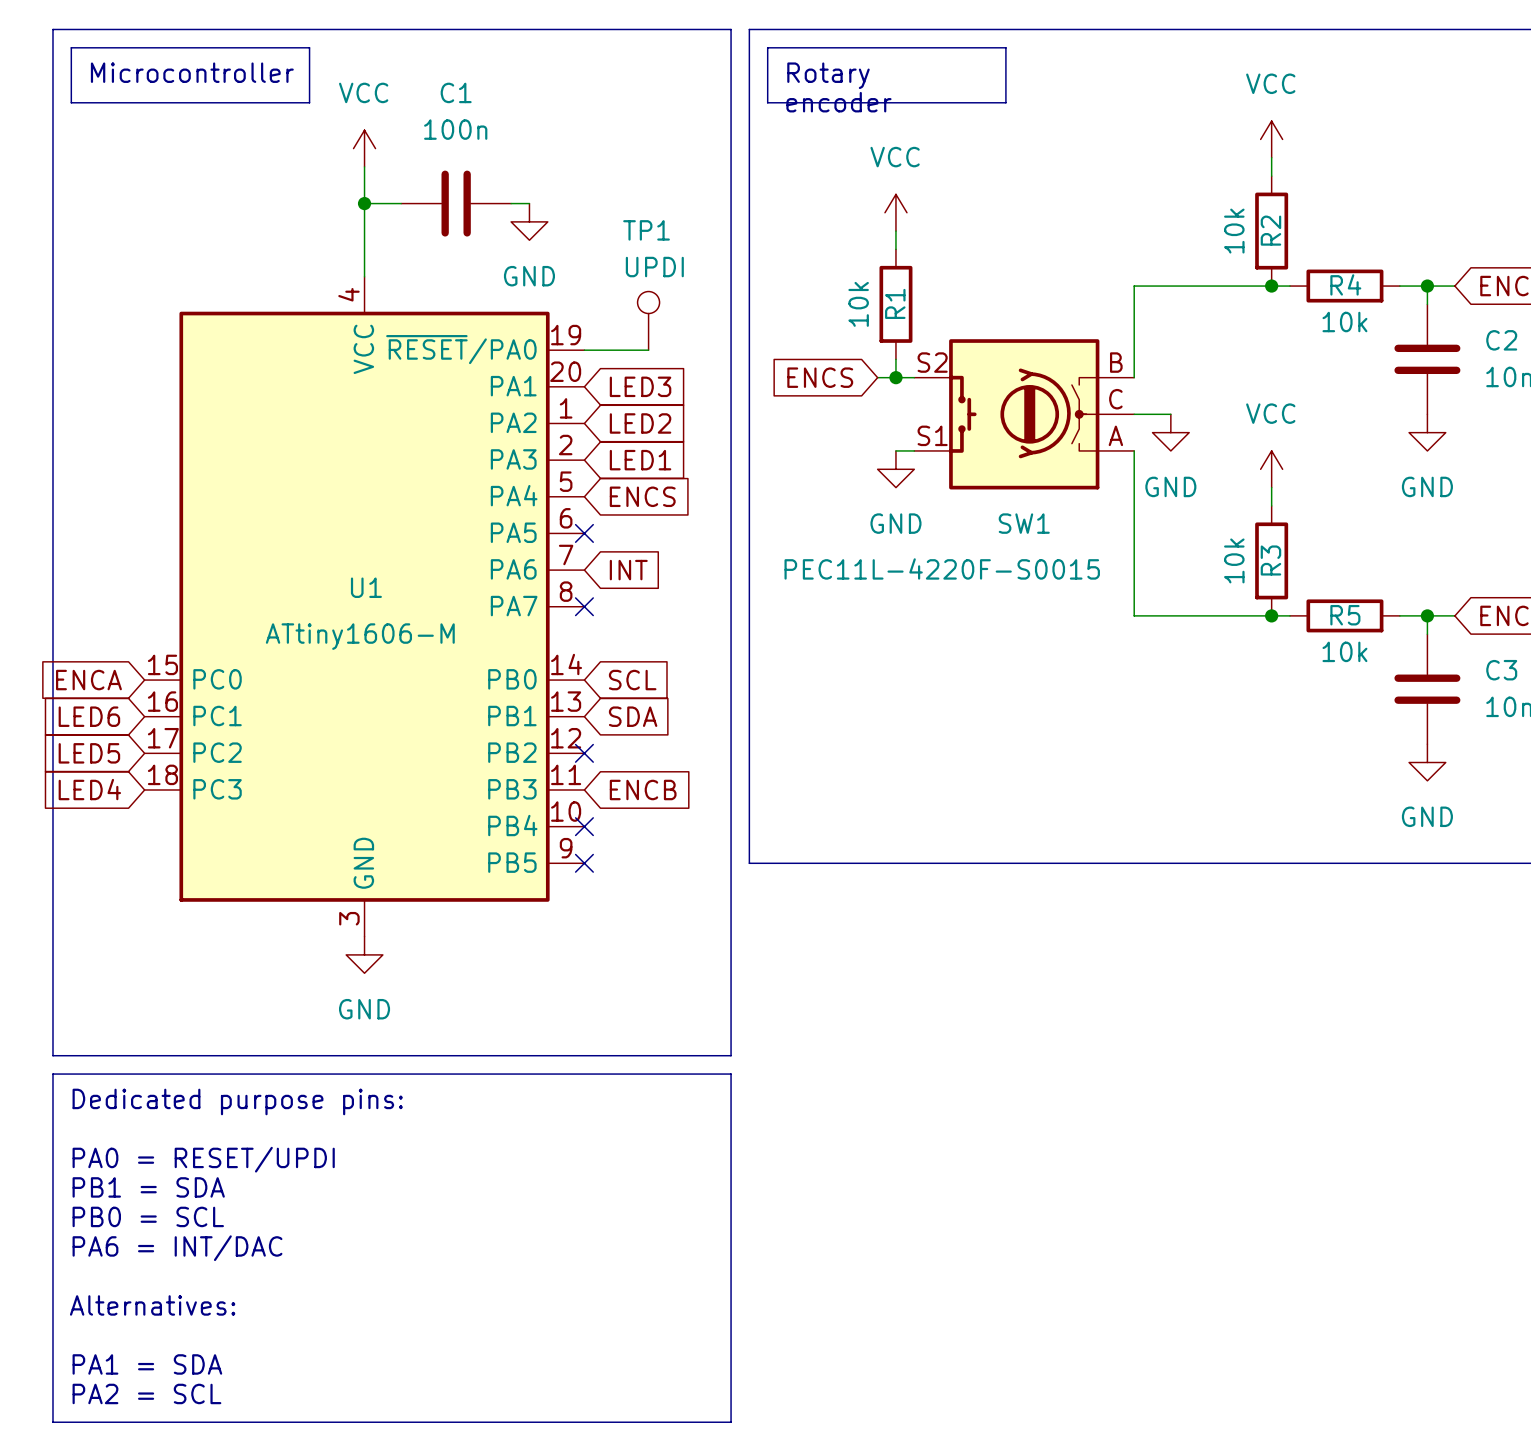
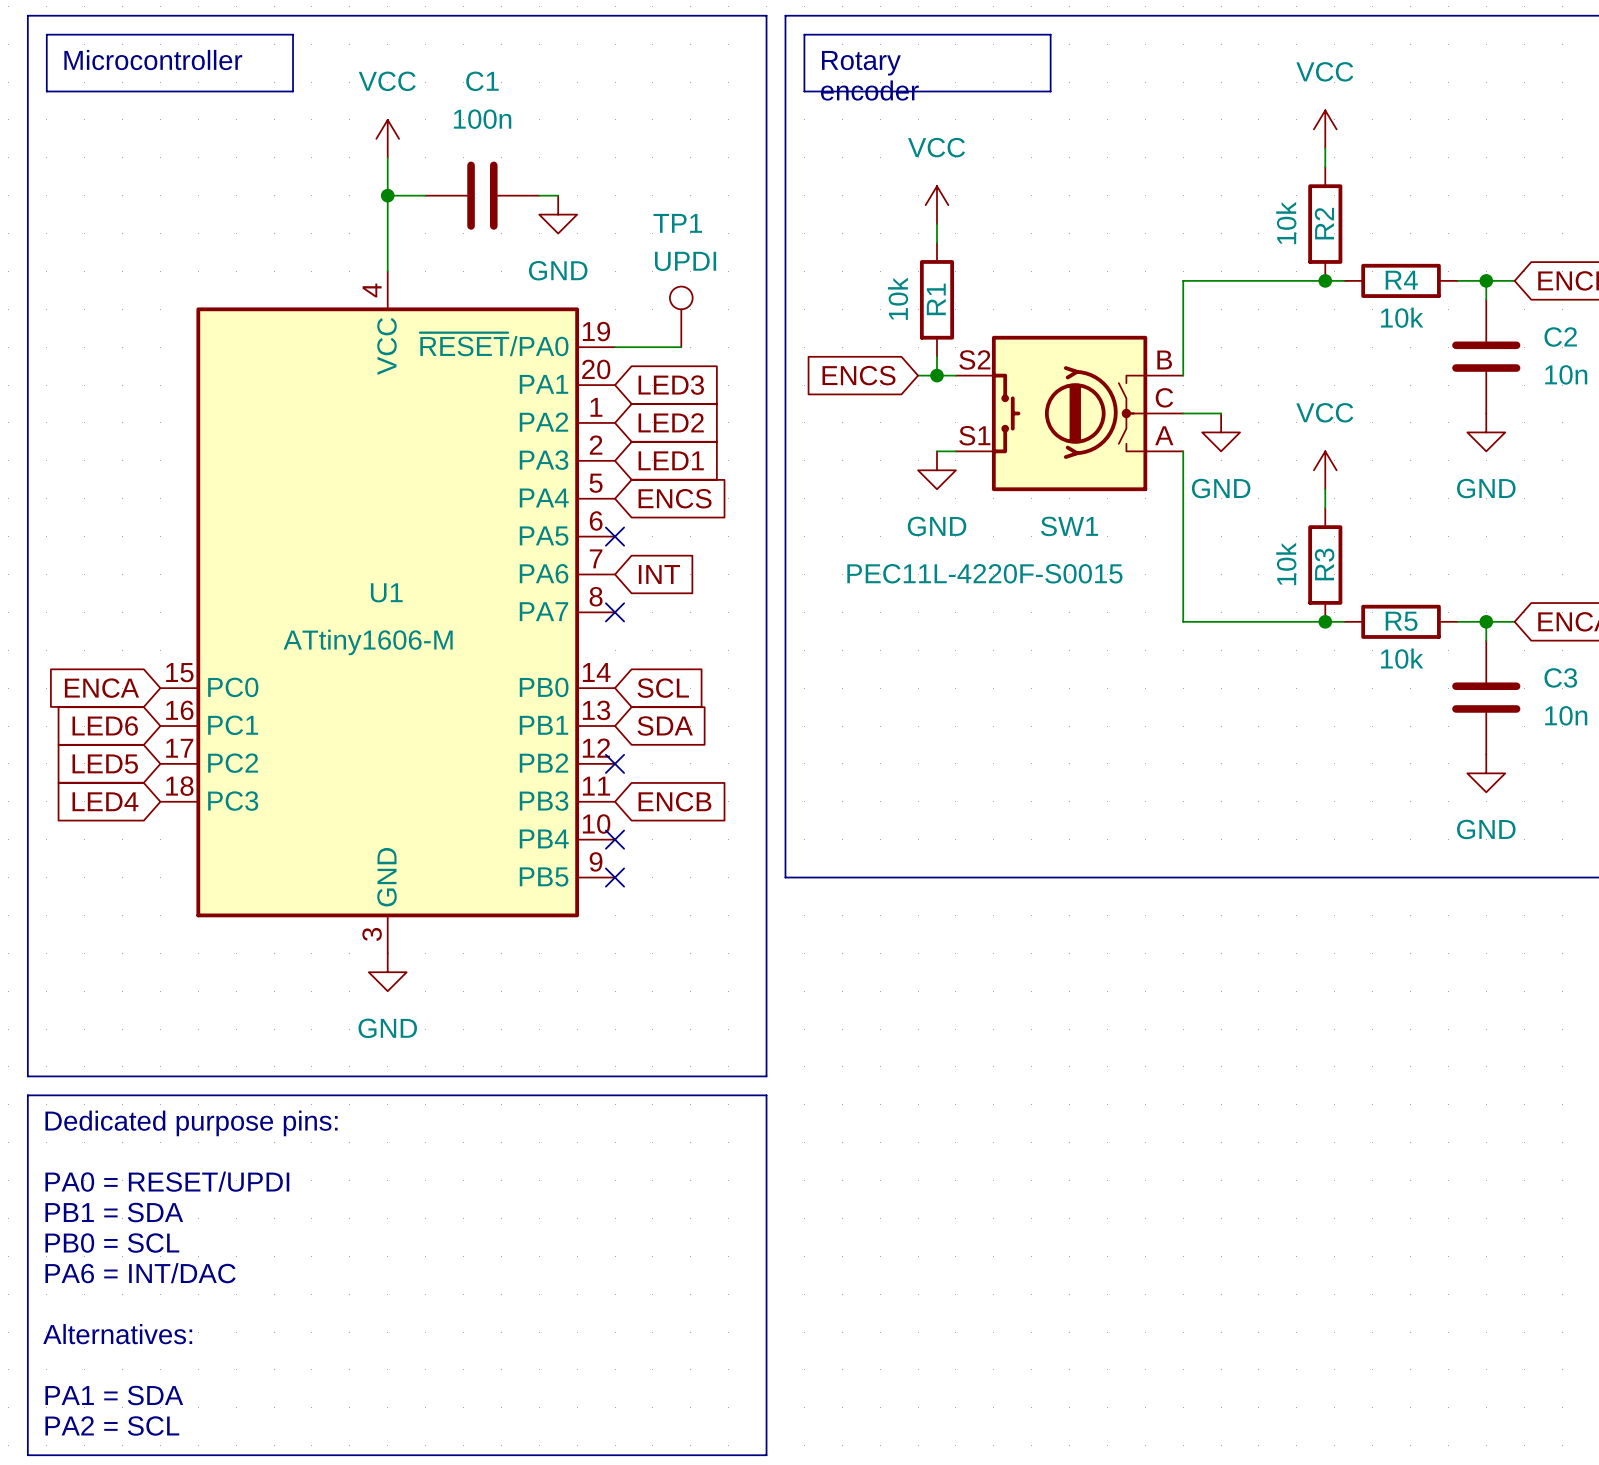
line: (52, 29) (52, 1055) -> (65, 15) (27, 15) (27, 1076) (65, 1076)
line: (71, 47) (71, 102) (309, 102) (309, 47) (272, 47) -> (84, 34) (46, 34) (46, 91) (293, 91) (293, 34)
text position: Microcontroller (192, 72) -> Microcontroller (153, 60)
line: (52, 1074) (52, 1422) (731, 1422) -> (65, 1095) (27, 1095) (27, 1455) (766, 1455)
text position: Dedicated purpose pins: (237, 1101) -> Dedicated purpose pins: (191, 1123)
text position: PA0 = RESET/UPDI (203, 1159) -> PA0 = RESET/UPDI (167, 1181)
text position: PB1 = SDA (148, 1187) -> PB1 = SDA (114, 1212)
text position: PB0 = SCL (148, 1216) -> PB0 = SCL (112, 1243)
text position: PA6 = INT/DAC (177, 1248) -> PA6 = INT/DAC (140, 1273)
text position: Alternatives: (152, 1305) -> Alternatives: (117, 1334)
text position: PA1 = SDA (147, 1364) -> PA1 = SDA (114, 1395)
text position: PA2 = SCL (146, 1393) -> PA2 = SCL (112, 1426)

